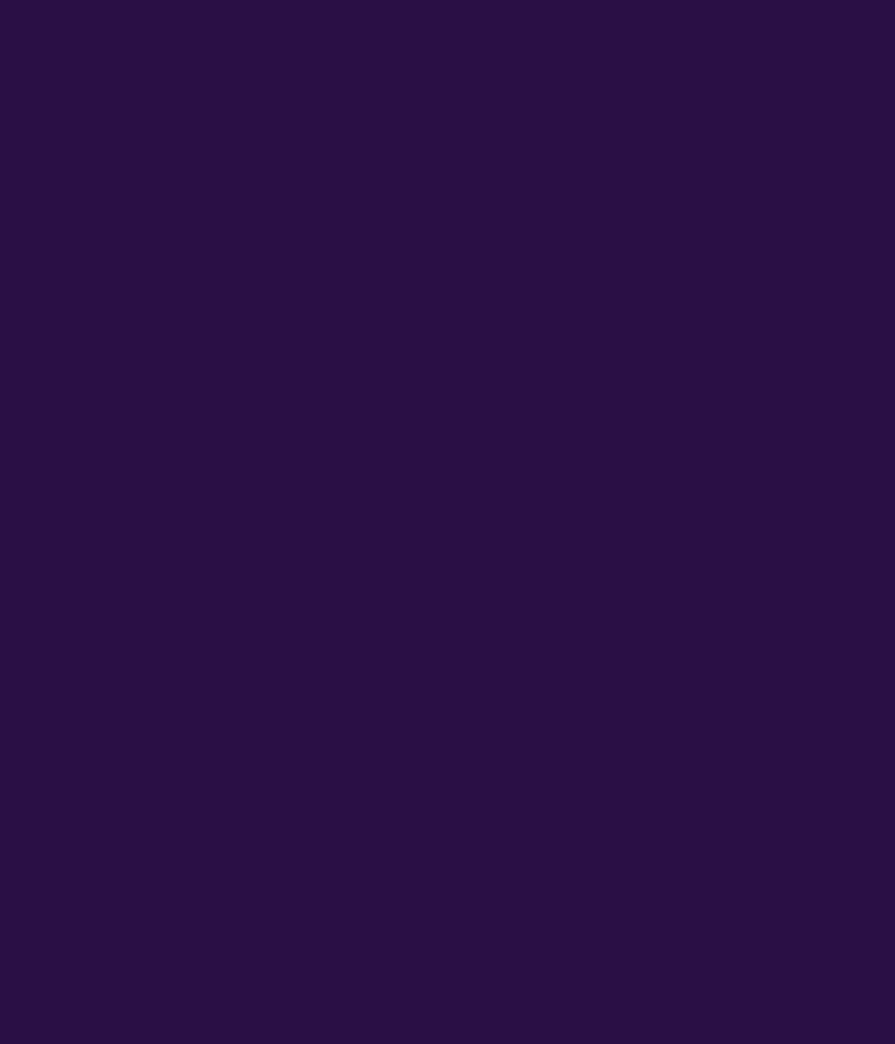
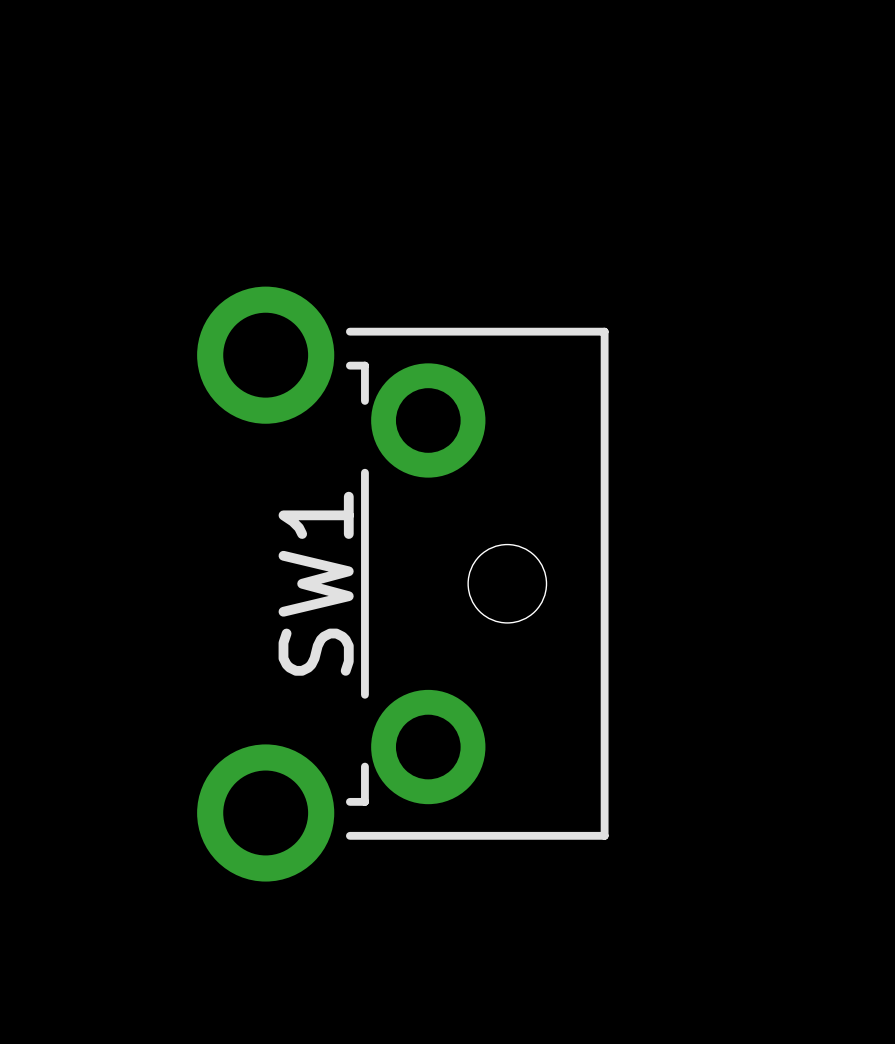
SW1: none -> (402, 584)

